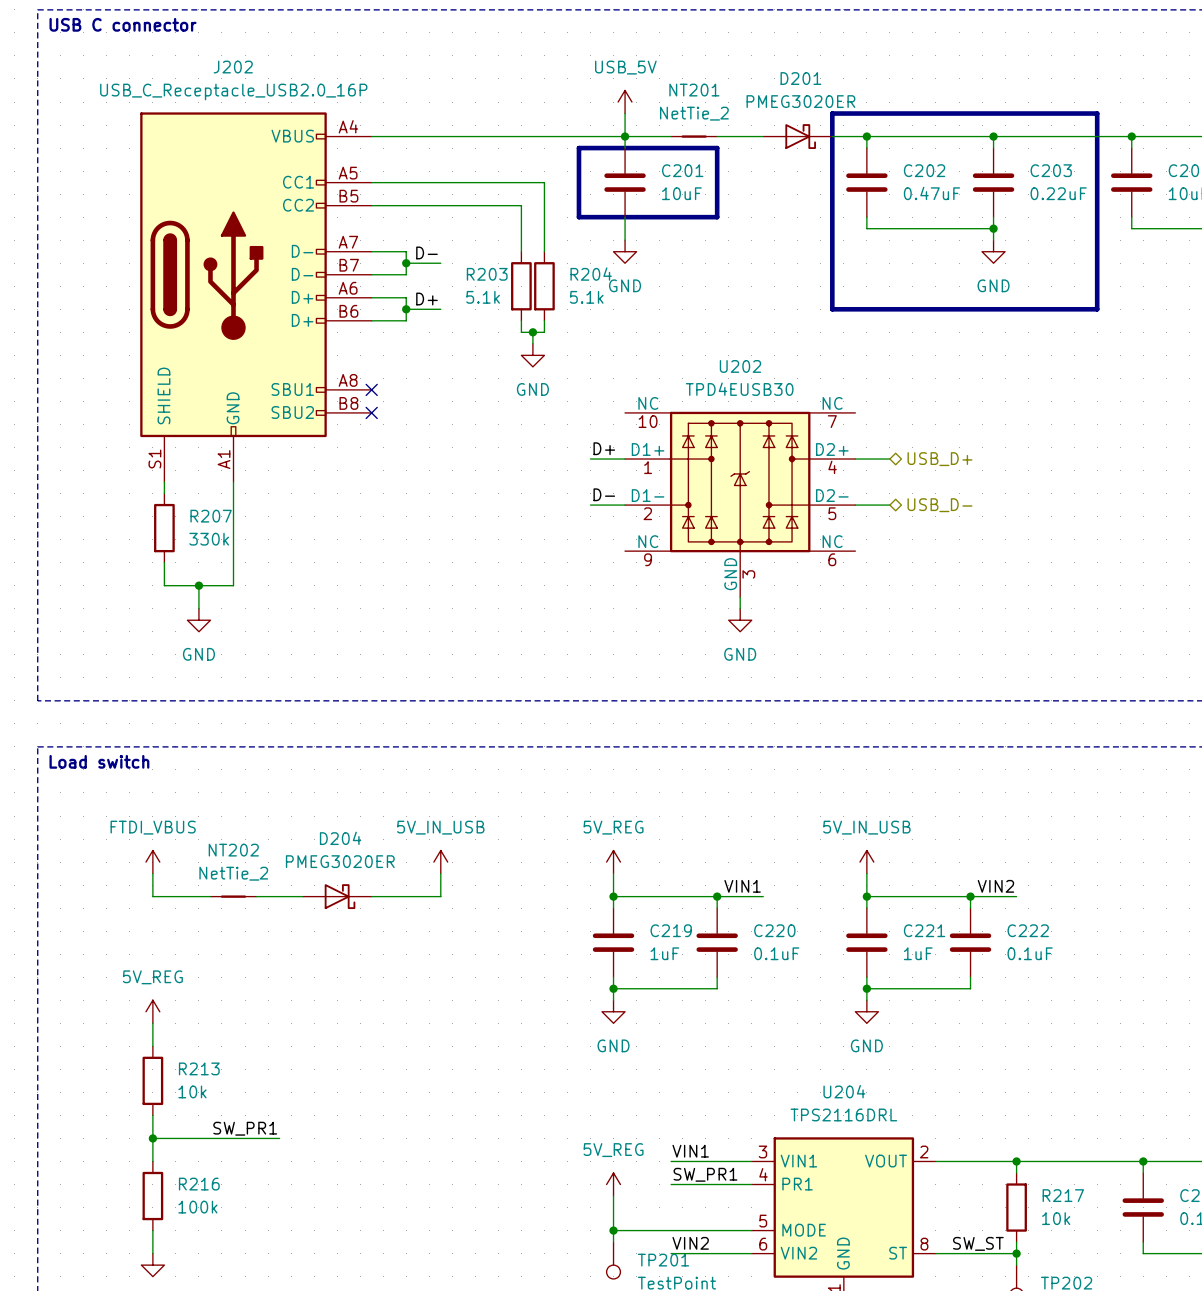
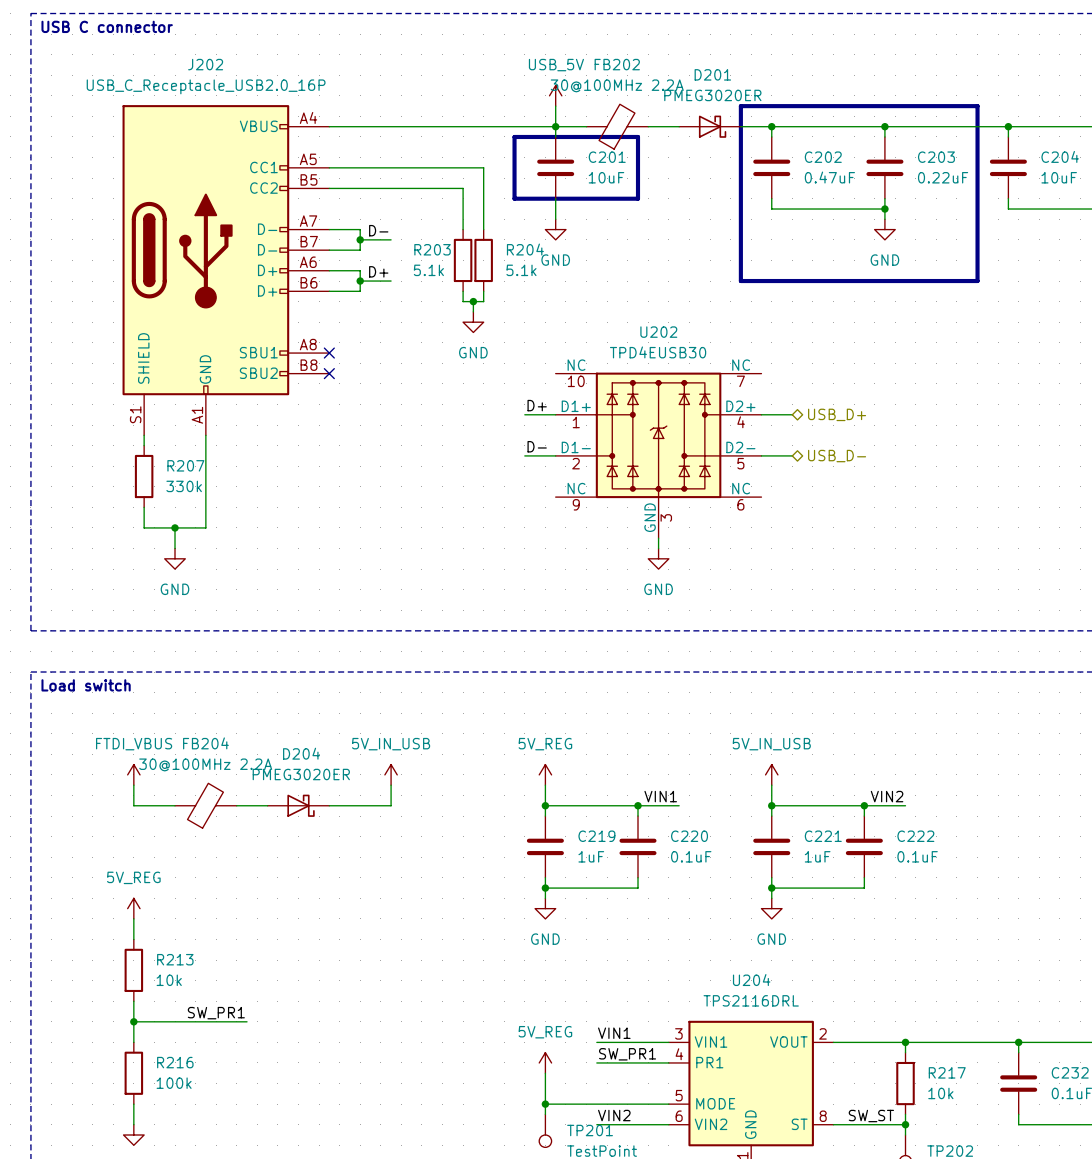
NT201: NetTie_2 (694, 136) -> none
FB202: none -> 30@100MHz 2.2A (617, 126)
NT202: NetTie_2 (233, 896) -> none
FB204: none -> 30@100MHz 2.2A (205, 805)

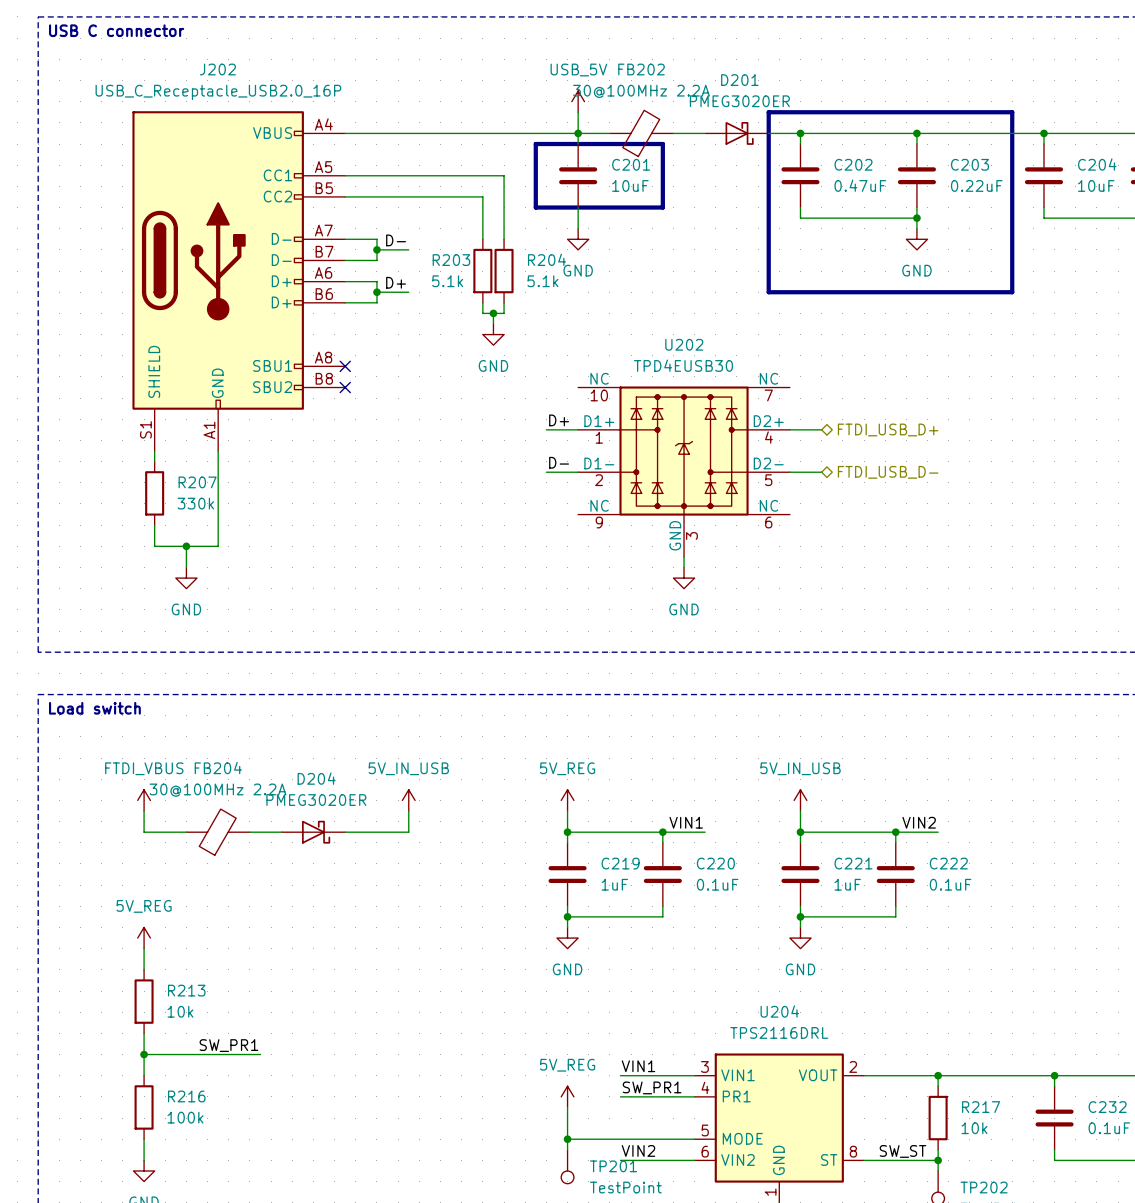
hierarchical label: USB_D+ (837, 414) -> FTDI_USB_D+ (888, 429)
hierarchical label: USB_D- (837, 456) -> FTDI_USB_D- (888, 472)

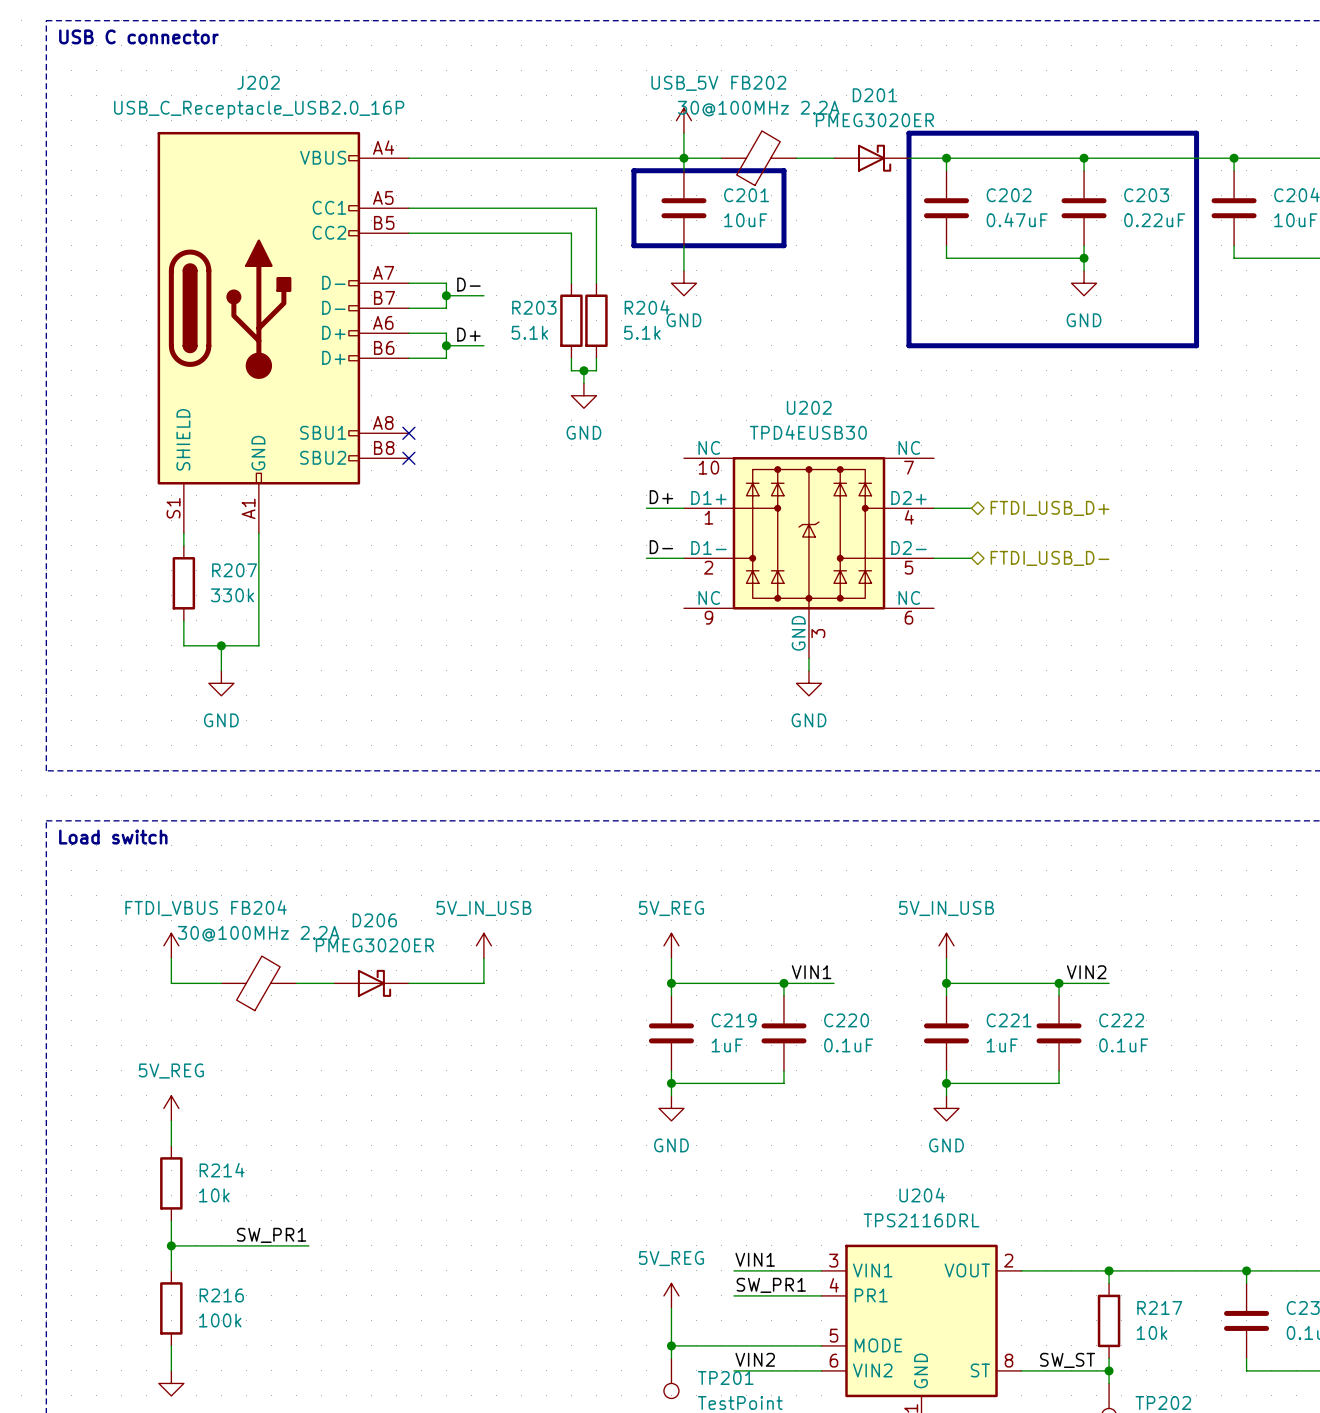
D204 name: D204 (316, 778) -> D206 (374, 920)
R213 name: R213 (186, 990) -> R214 (222, 1170)

